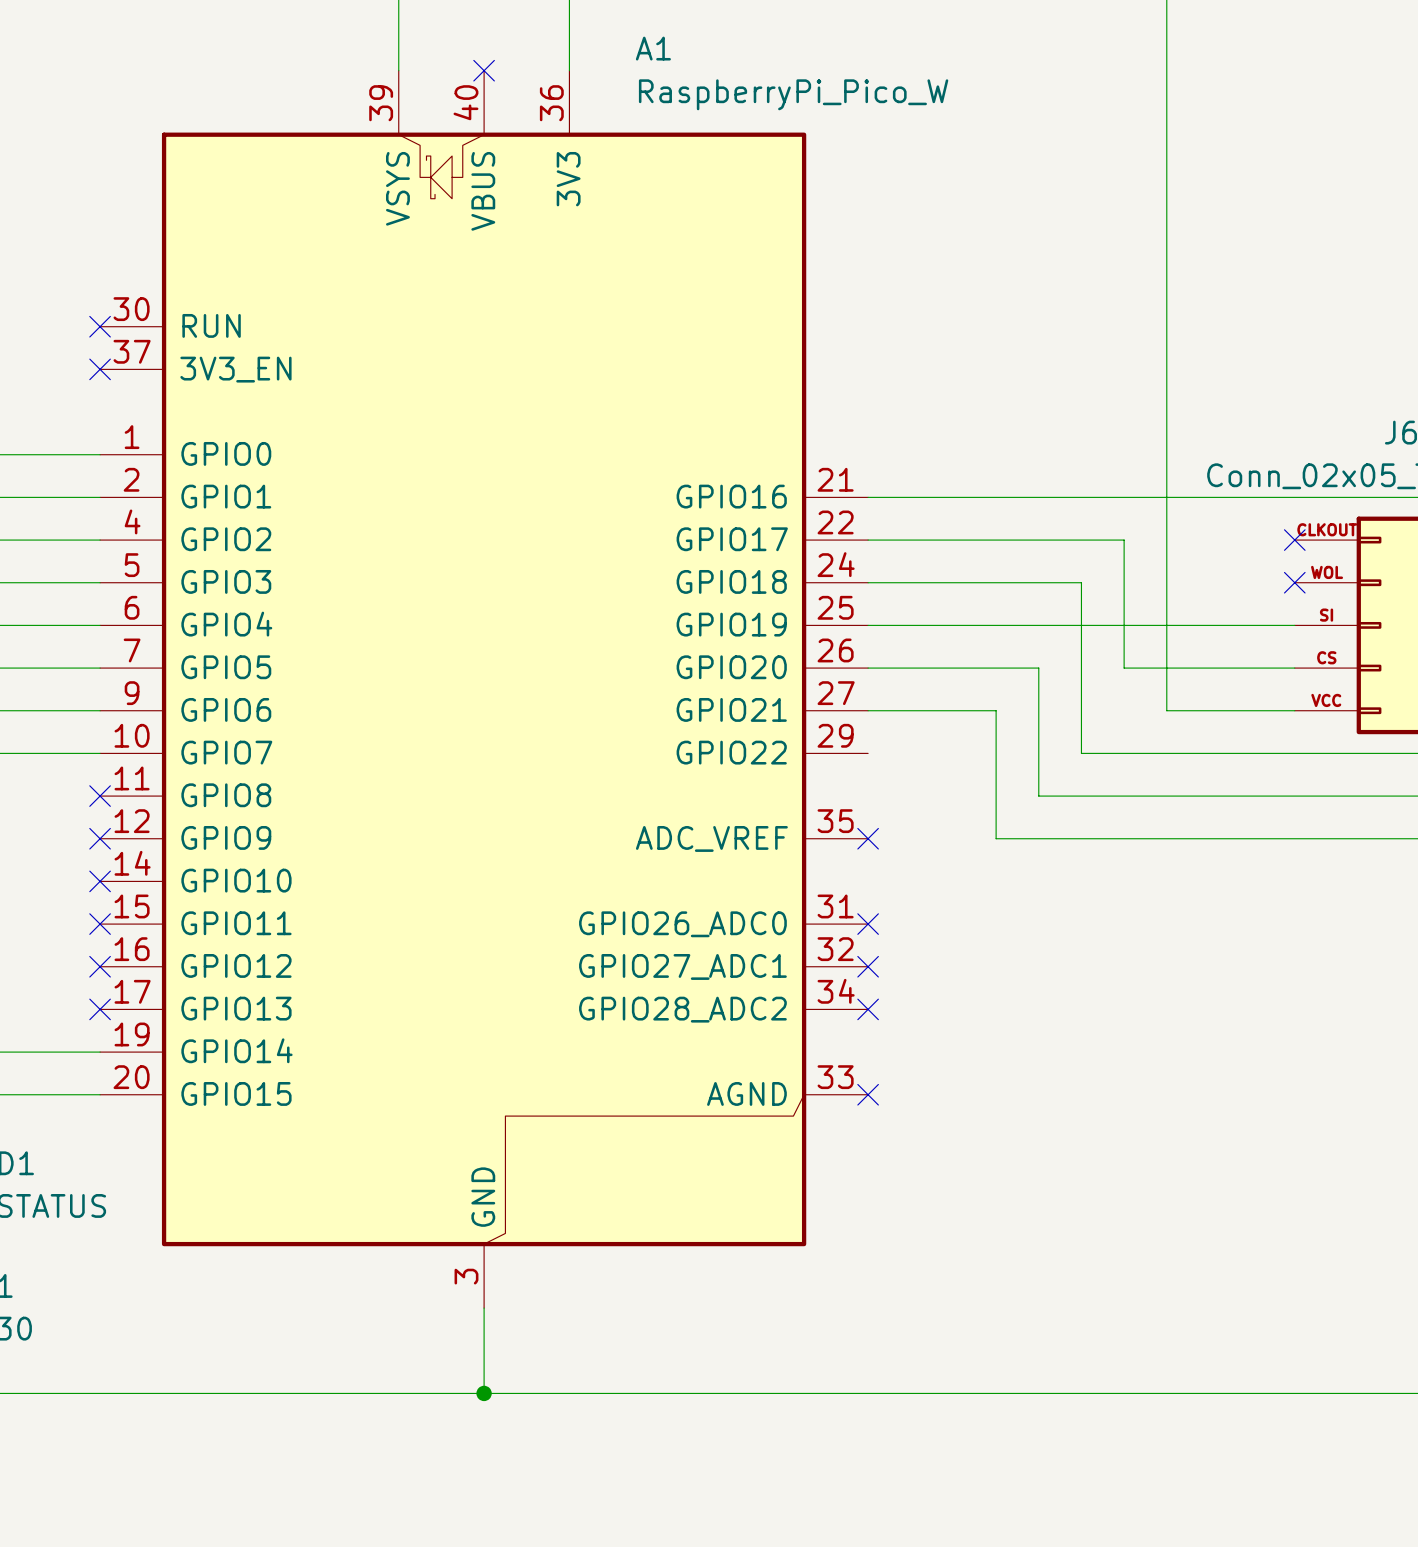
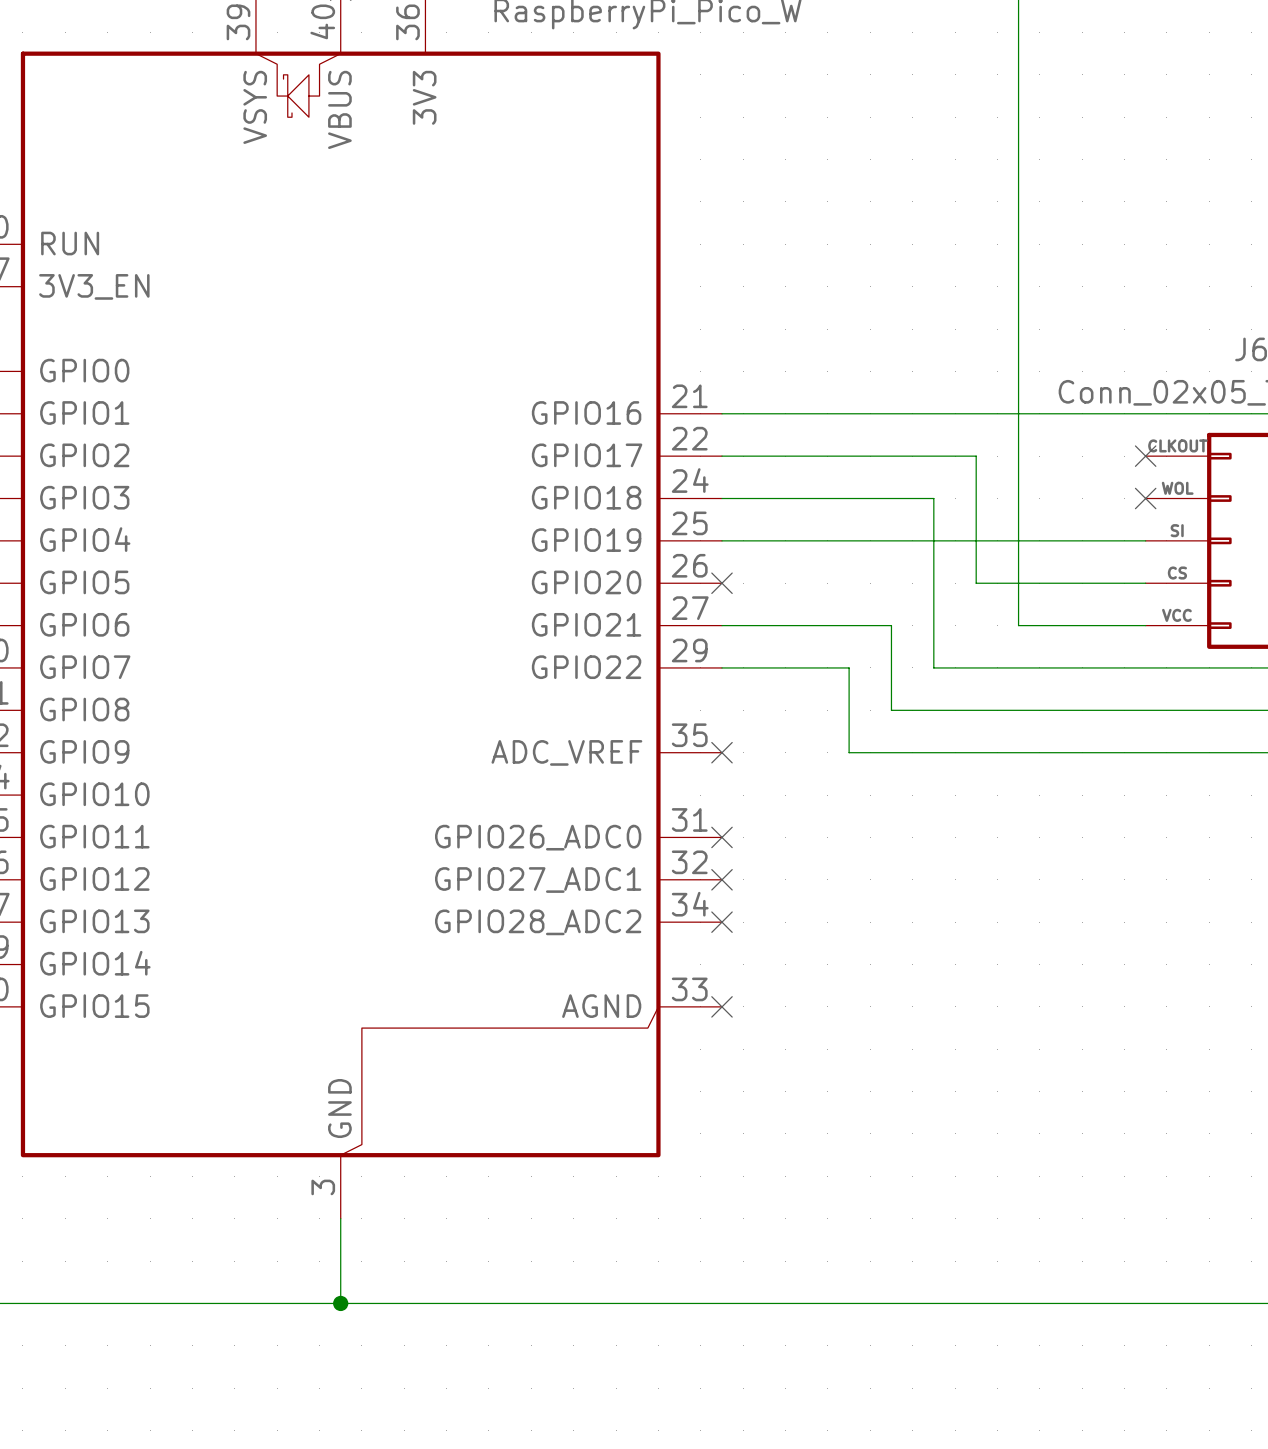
wire: (868, 668) (1038, 668) (1038, 710) -> none
no-connect mark: none -> (722, 583)
wire: (996, 710) (996, 753) -> (849, 625) (891, 625)
wire: none -> (722, 667) (849, 667)

